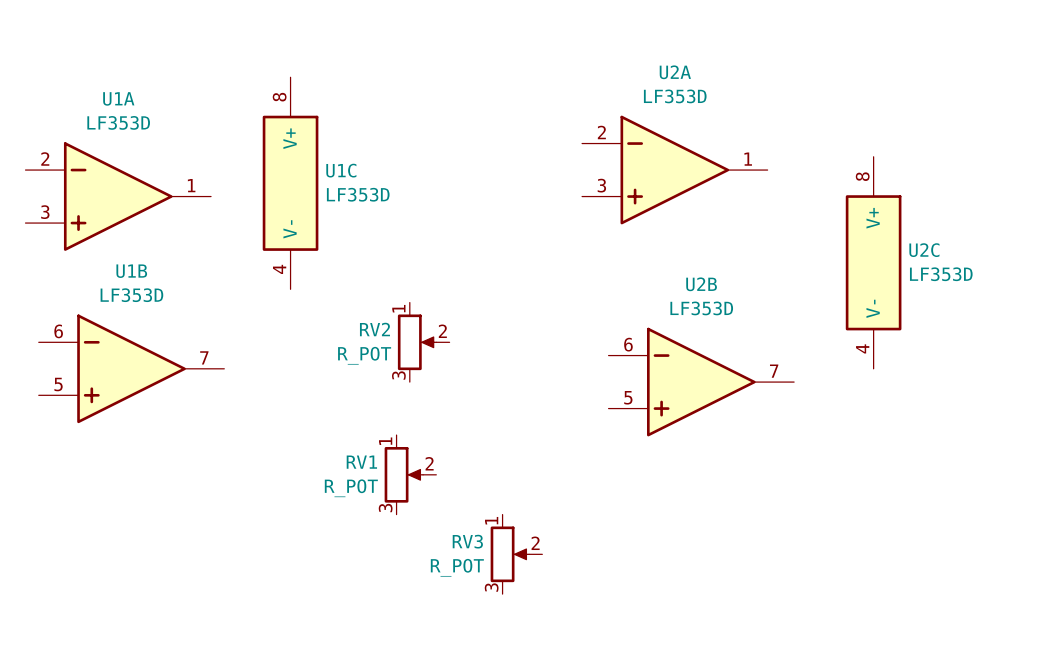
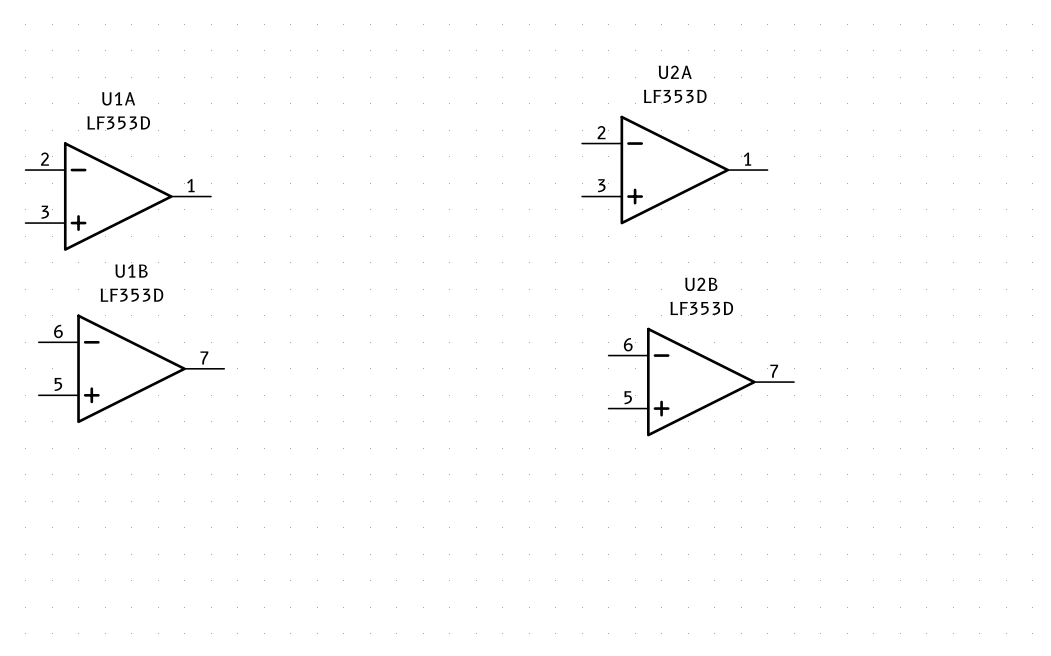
U1C: LF353D (290, 183) -> none
U2C: LF353D (873, 262) -> none
RV2: R_POT (423, 342) -> none
RV1: R_POT (410, 474) -> none
RV3: R_POT (516, 554) -> none

